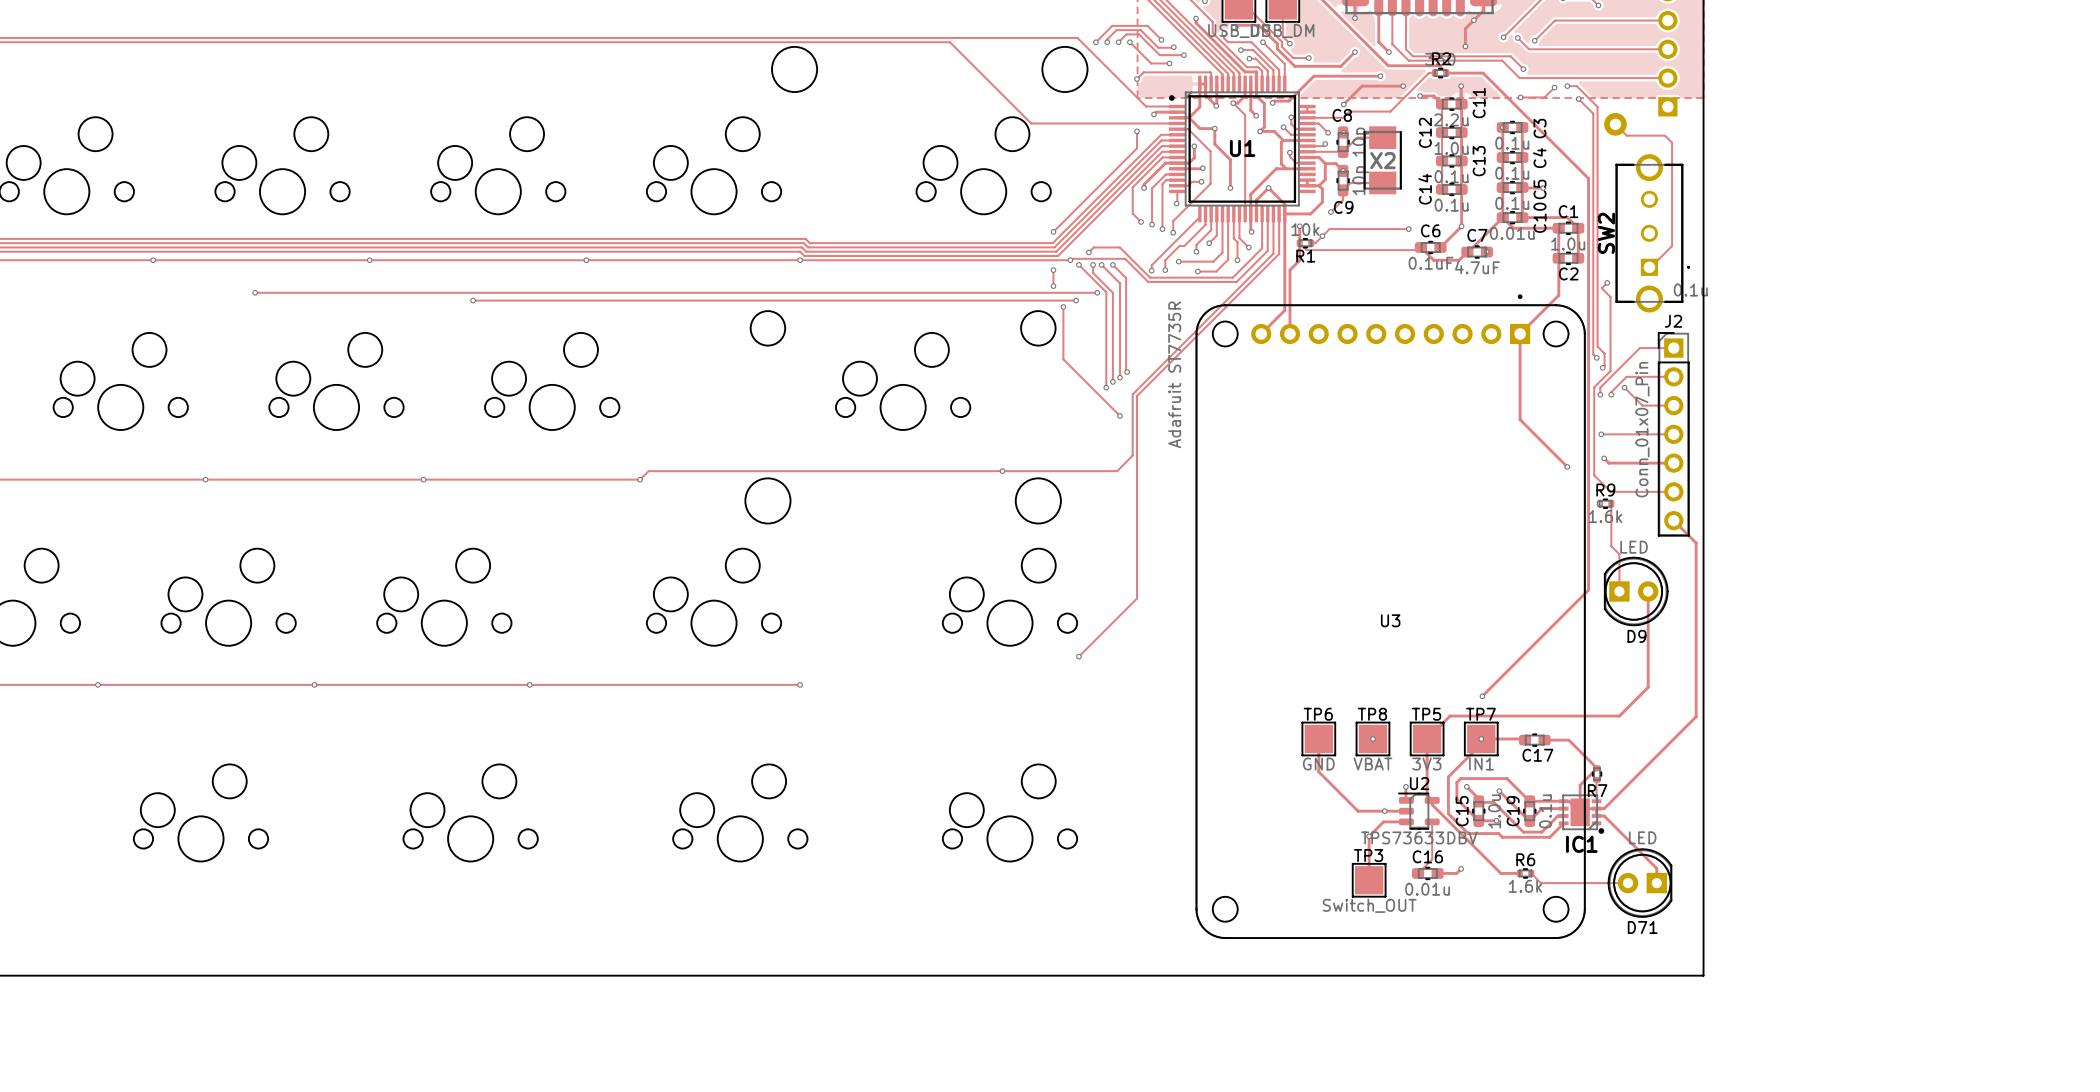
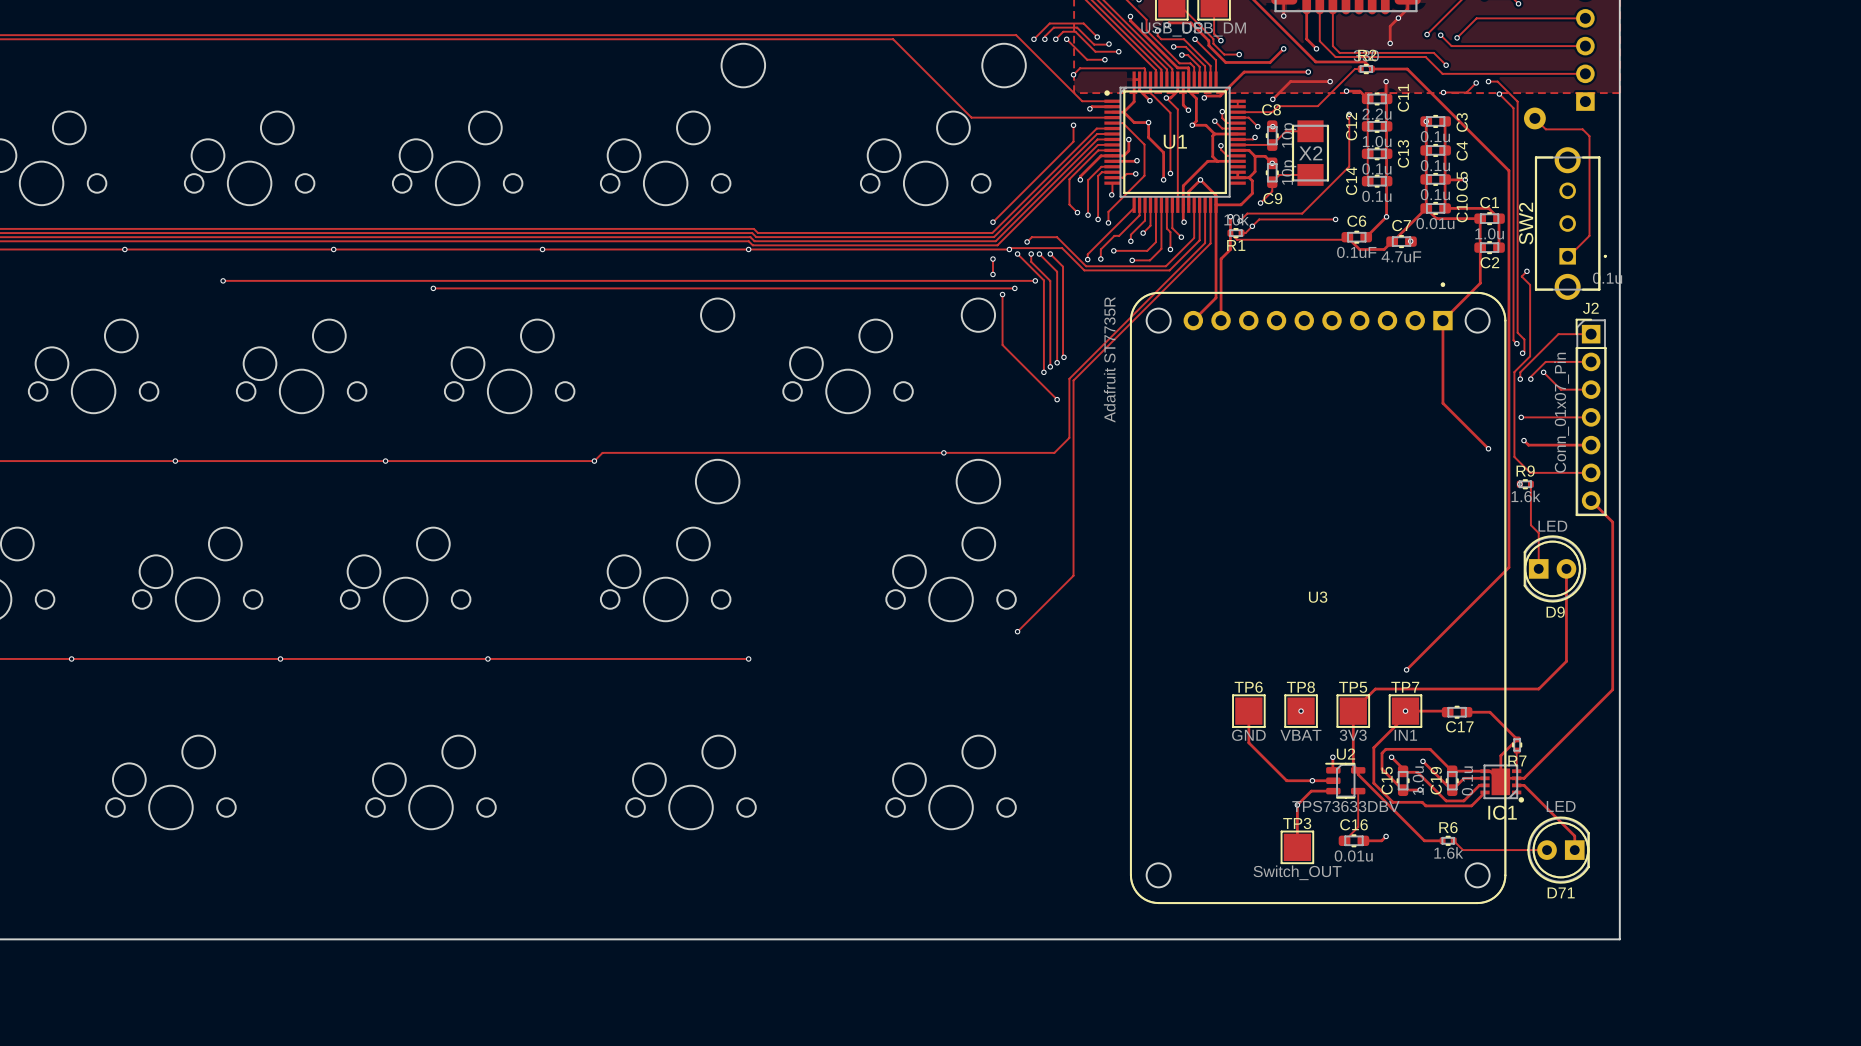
track: (1216, 97) (1216, 105) -> (1150, 92) (1170, 112) (1170, 173)
track: none -> (1349, 114) (1349, 166) (1302, 213) (1247, 213) (1240, 220)
via: none -> (1349, 114)
via: none -> (1170, 173)
via: none -> (1240, 220)

